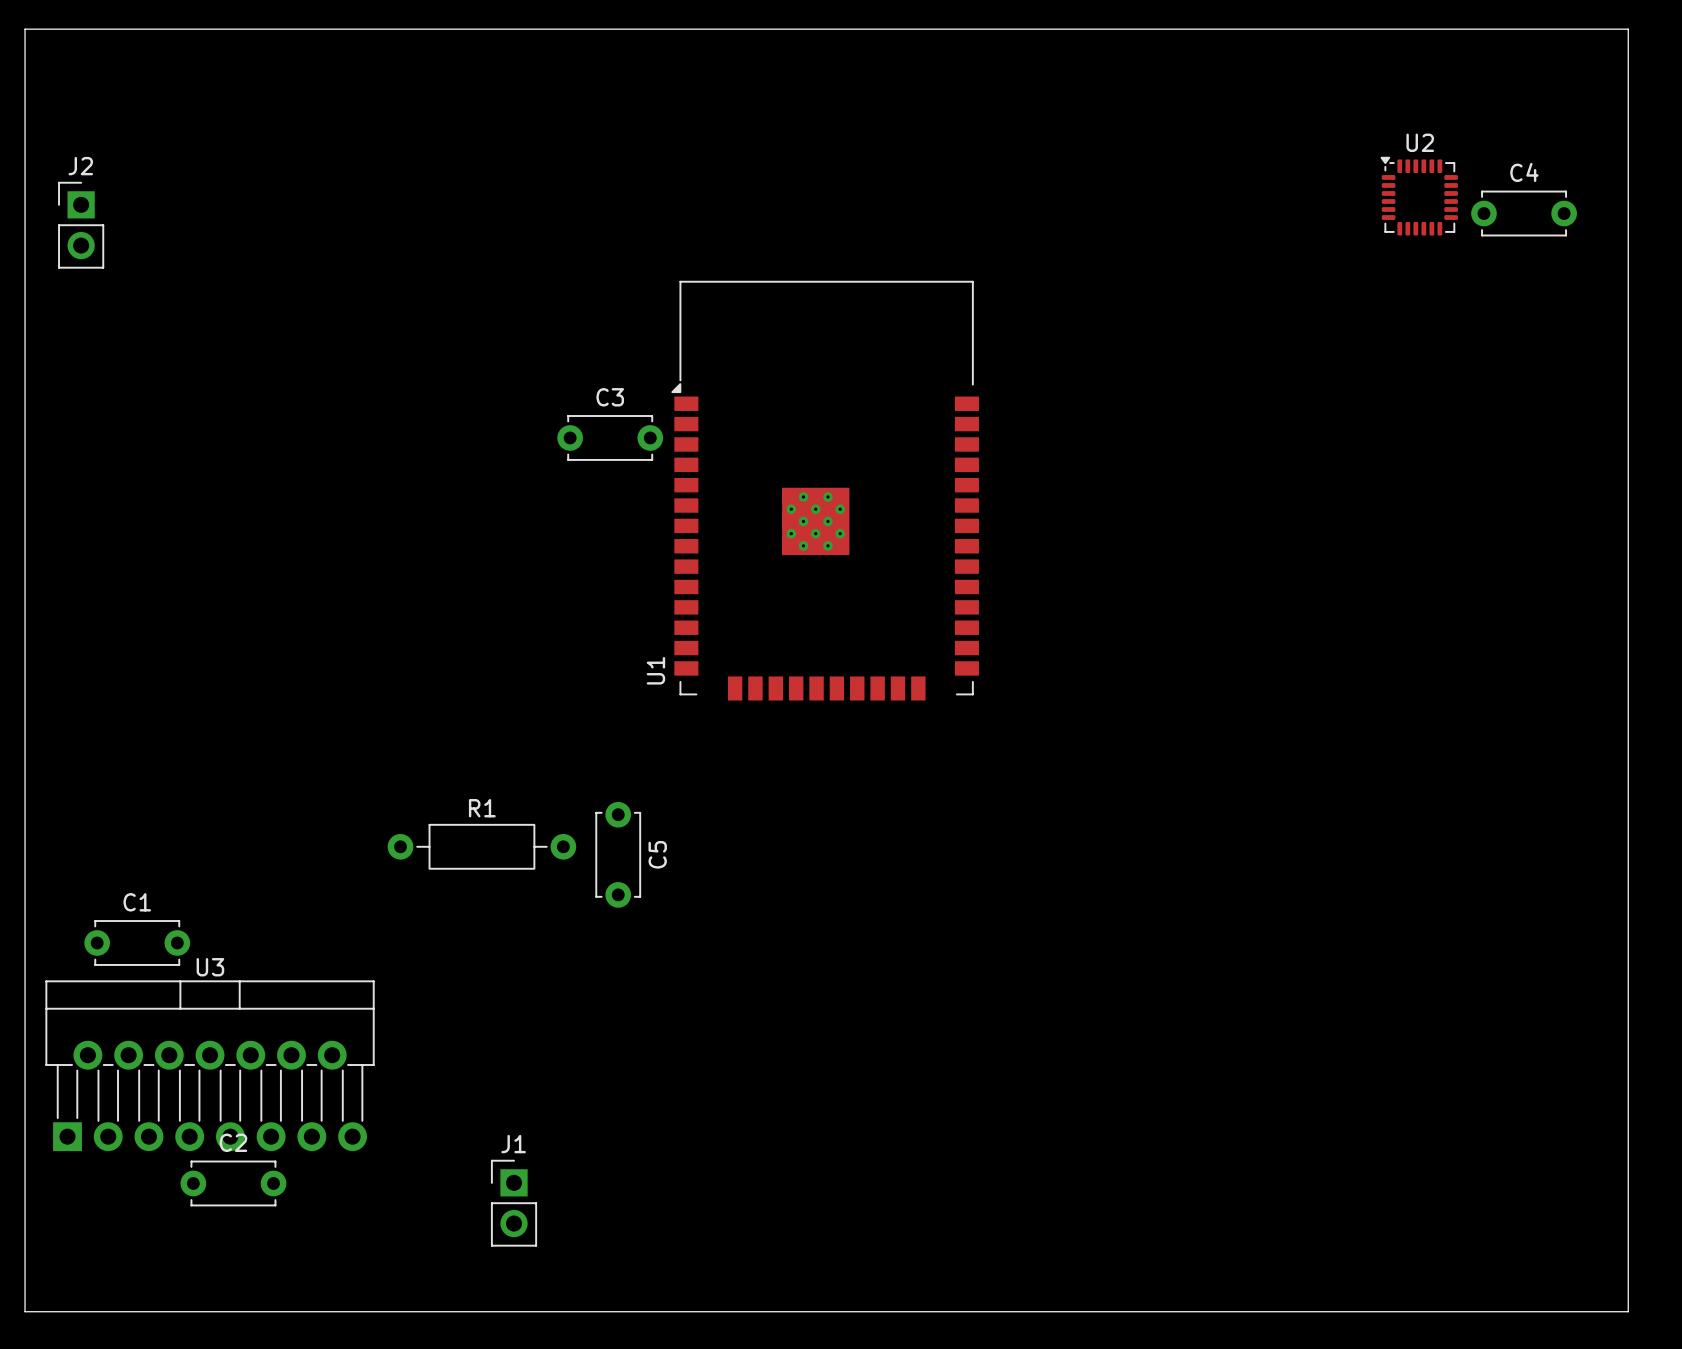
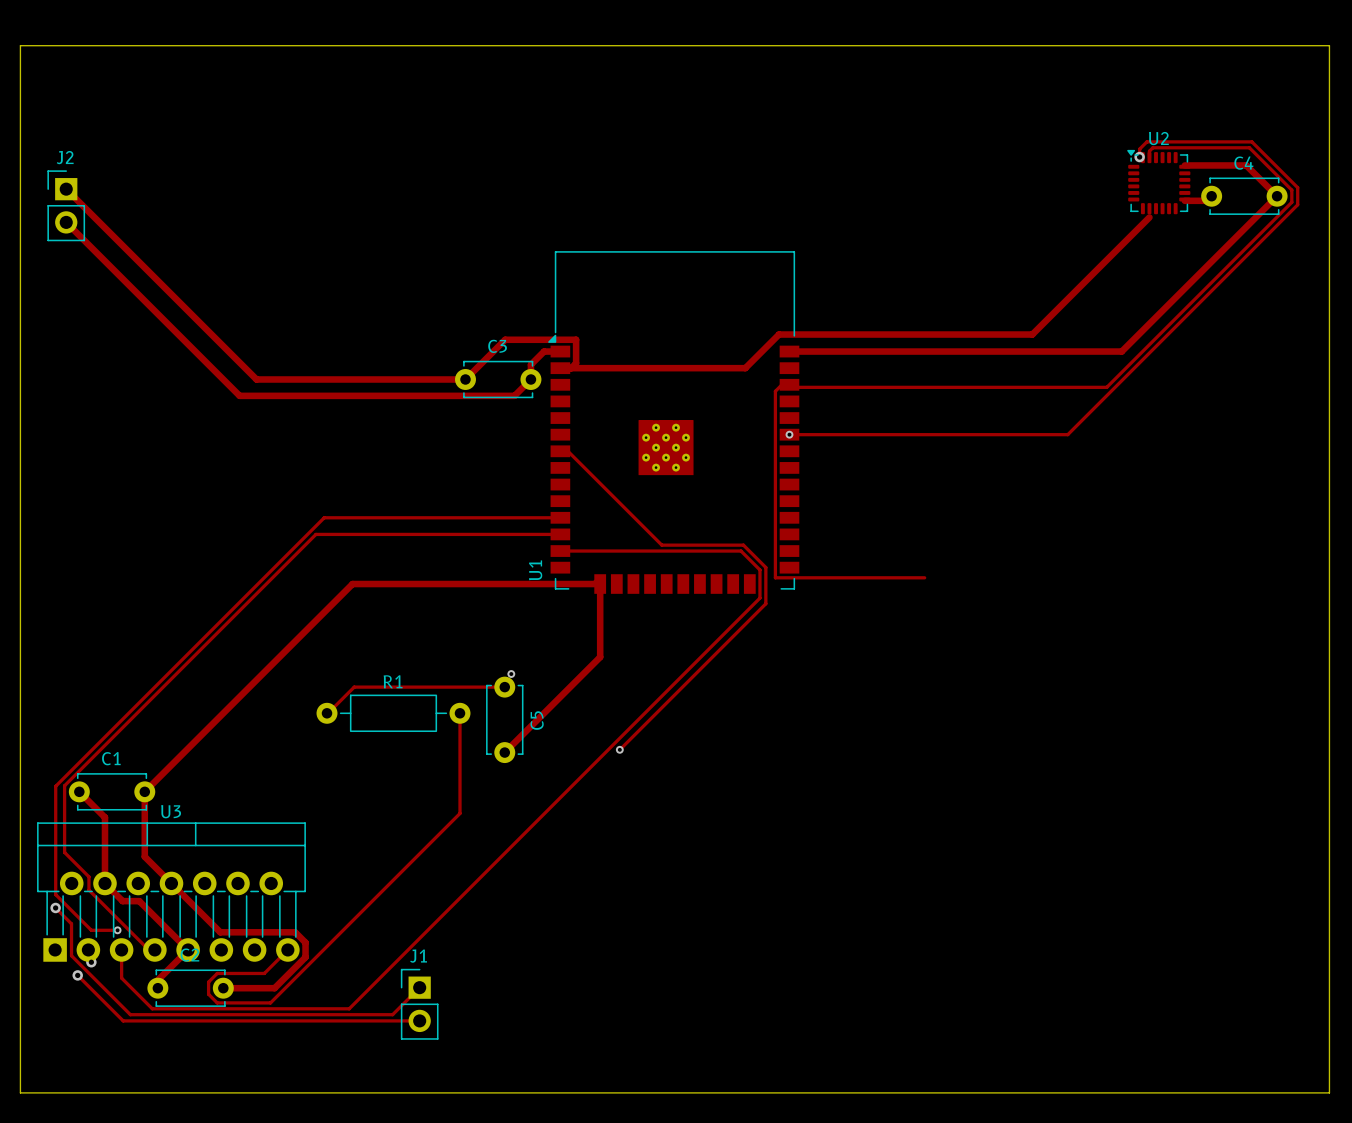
track: none -> (1139, 157) (1139, 149) (1146, 141) (1251, 141) (1297, 187) (1297, 204) (1067, 434) (789, 434)
via: none -> (1139, 157)
track: none -> (1149, 157) (1149, 151) (1152, 147) (1249, 147) (1291, 190) (1291, 202) (1106, 387) (794, 387) (791, 384) (783, 383) (775, 391) (775, 577) (924, 577)
track: none -> (1184, 165) (1246, 165) (1277, 196) (1121, 351) (789, 351)
track: none -> (66, 189) (256, 379) (465, 379) (505, 339) (576, 339) (576, 363) (571, 368)
track: none -> (1211, 196) (1207, 200) (1184, 200)
track: none -> (1149, 217) (1032, 334) (779, 334) (745, 368) (560, 368)
track: none -> (66, 222) (239, 395) (514, 395) (530, 379) (530, 364) (544, 351) (560, 351)
via: none -> (789, 434)
track: none -> (560, 451) (567, 451) (661, 545) (743, 545) (765, 567) (765, 603) (619, 749)
track: none -> (560, 517) (324, 517) (55, 786) (55, 894) (91, 930) (117, 930)
track: none -> (560, 534) (315, 534) (64, 785) (64, 852) (88, 876) (88, 890) (148, 949) (154, 949)
track: none -> (560, 551) (741, 551) (759, 569) (759, 598) (349, 1008) (152, 1008) (121, 978) (121, 949)
via: none -> (511, 674)
track: none -> (504, 687) (354, 687) (327, 713)
track: none -> (458, 712) (460, 813) (270, 1002) (217, 1002) (208, 994) (208, 982) (217, 973) (264, 973) (287, 949)
via: none -> (619, 749)
track: none -> (504, 752) (600, 657) (600, 584) (352, 584) (144, 791)
track: none -> (79, 791) (104, 817) (104, 883) (122, 901) (139, 901) (188, 949) (157, 980) (157, 988)
track: none -> (144, 791) (144, 856) (220, 932) (295, 932) (305, 942) (305, 957) (274, 988) (223, 988)
track: none -> (55, 907) (71, 923) (71, 955) (130, 1014) (392, 1014) (419, 987)
via: none -> (55, 907)
via: none -> (117, 930)
via: none -> (91, 962)
track: none -> (77, 975) (123, 1020) (419, 1020)
via: none -> (77, 975)

